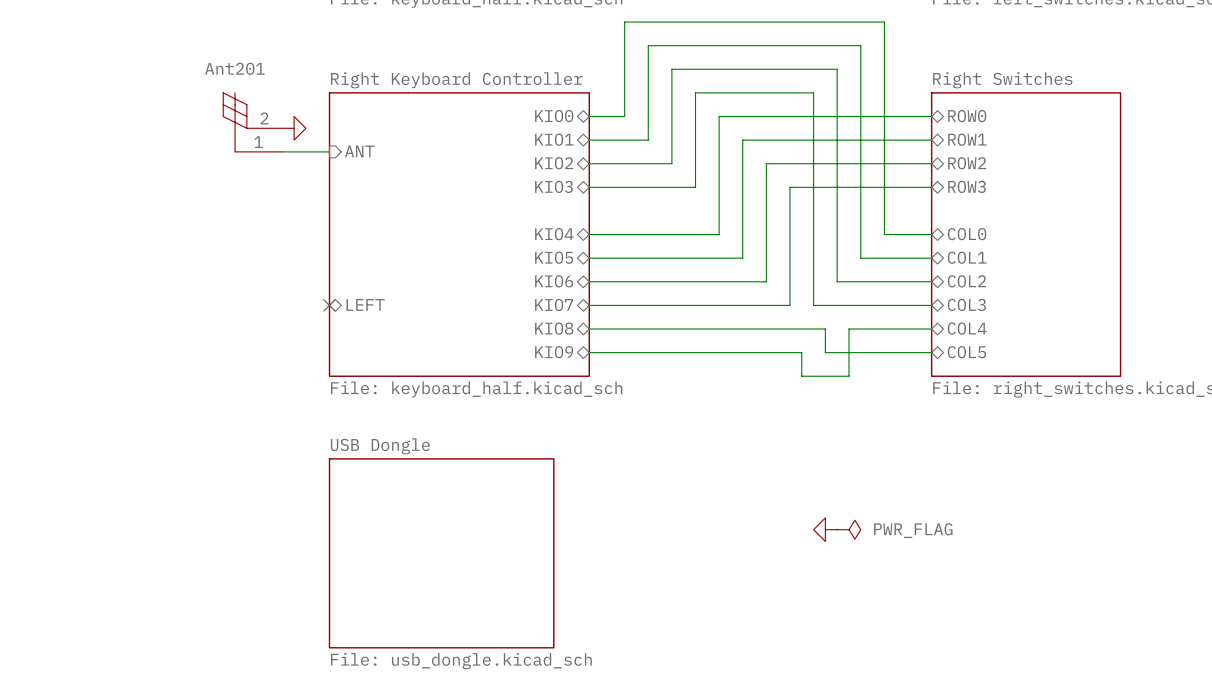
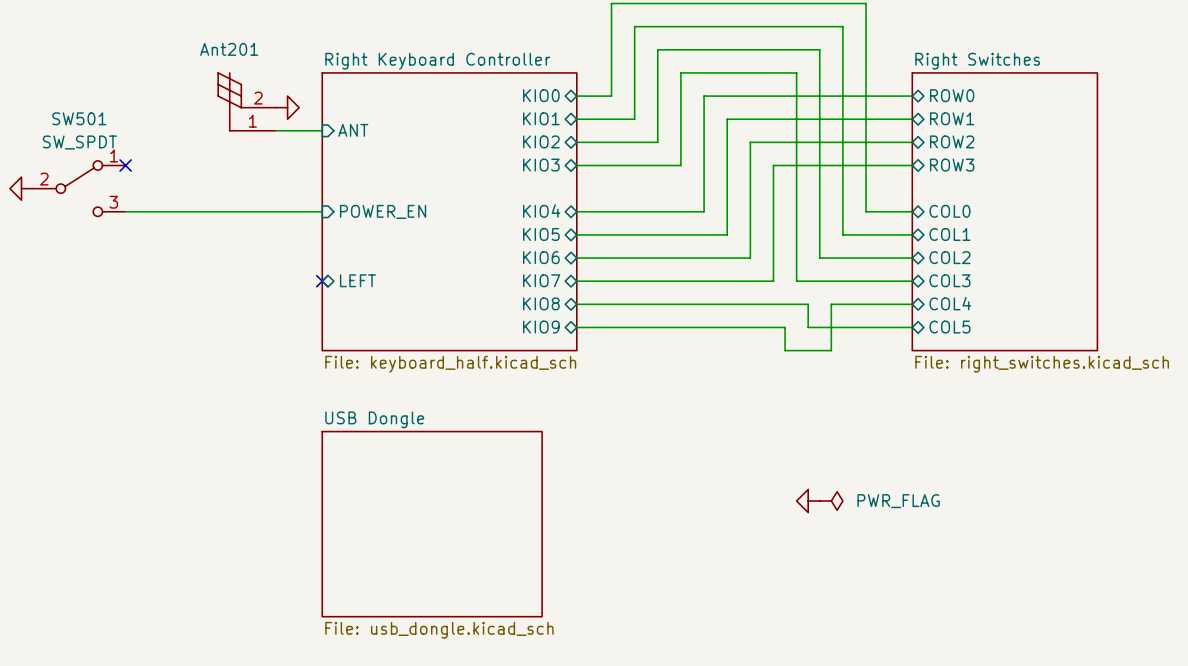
no-connect mark: none -> (125, 165)
power symbol: none -> (21, 188)
SW501: none -> SW_SPDT (79, 188)
wire: none -> (125, 211) (322, 211)
sheet pin: none -> POWER_EN (383, 211)

